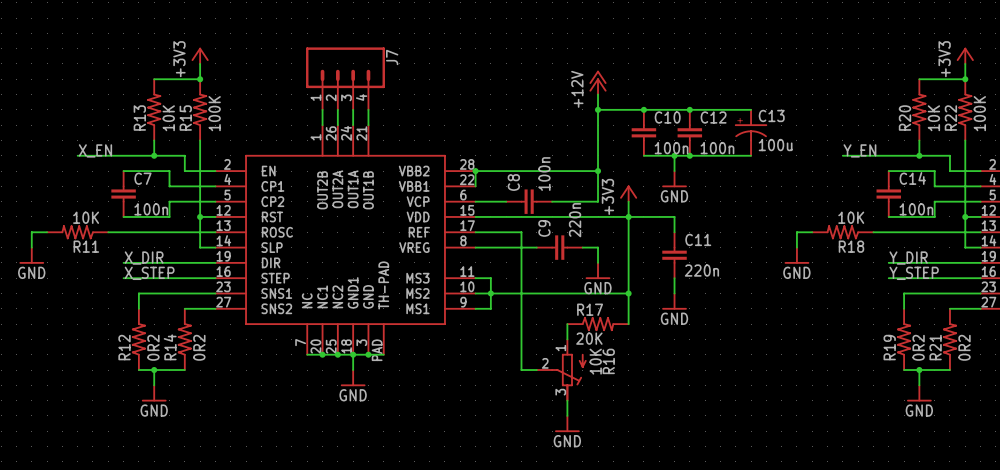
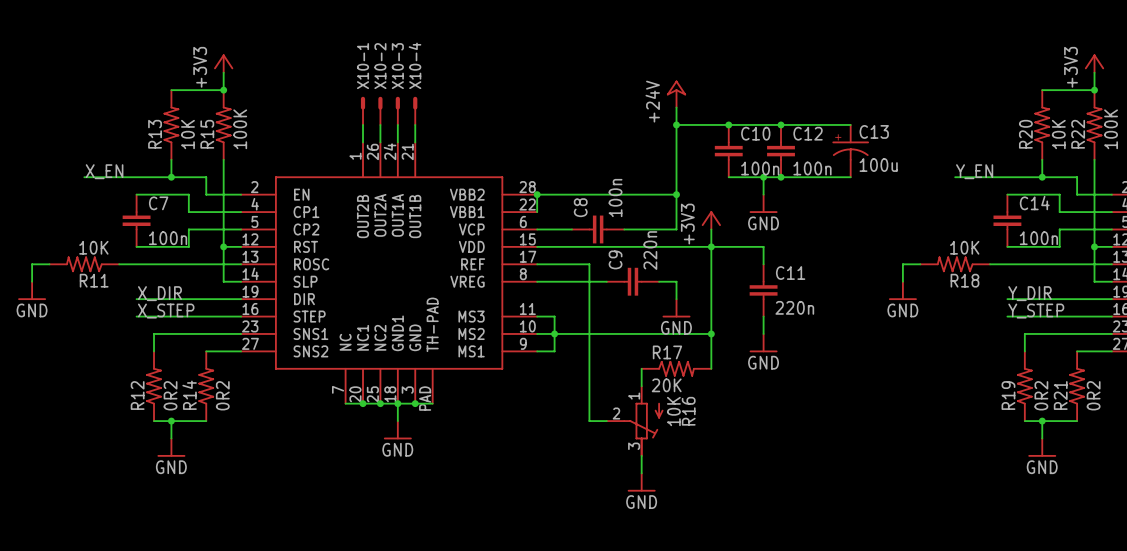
J7: (345, 78) -> none
power symbol: +12V (598, 82) -> +24V (676, 94)
X10-1: none -> (363, 110)
X10-2: none -> (380, 110)
X10-3: none -> (397, 110)
X10-4: none -> (415, 110)

